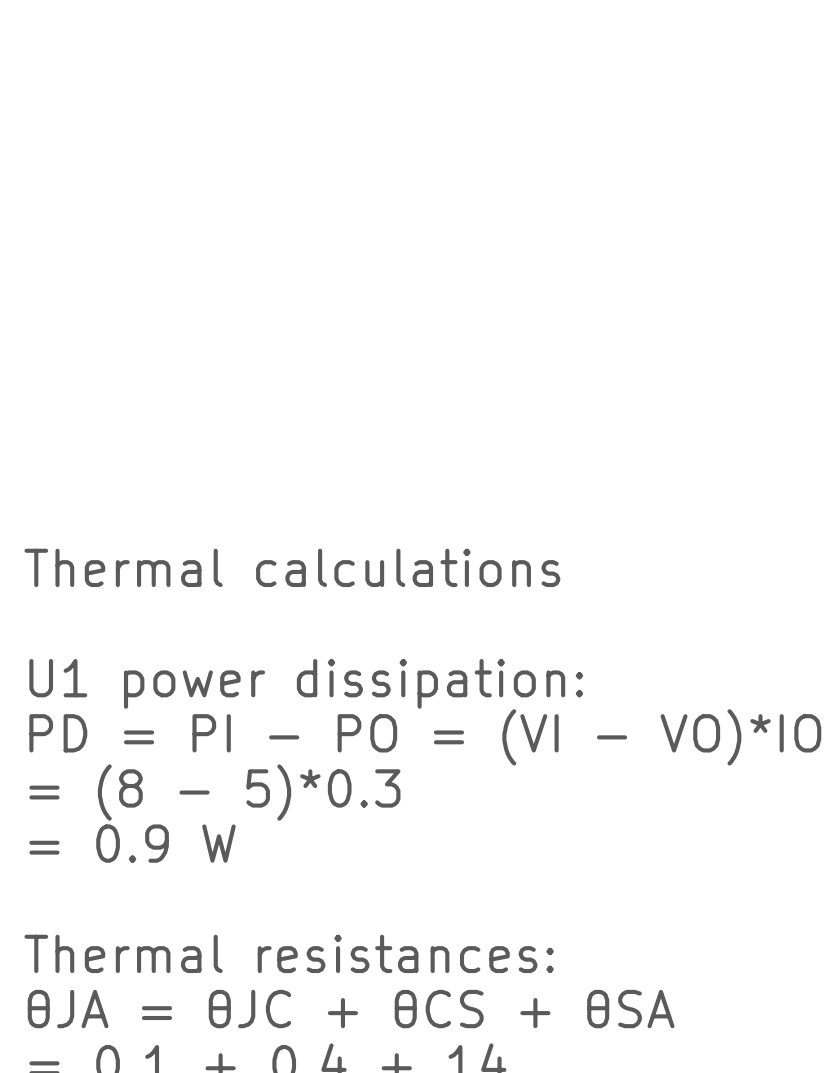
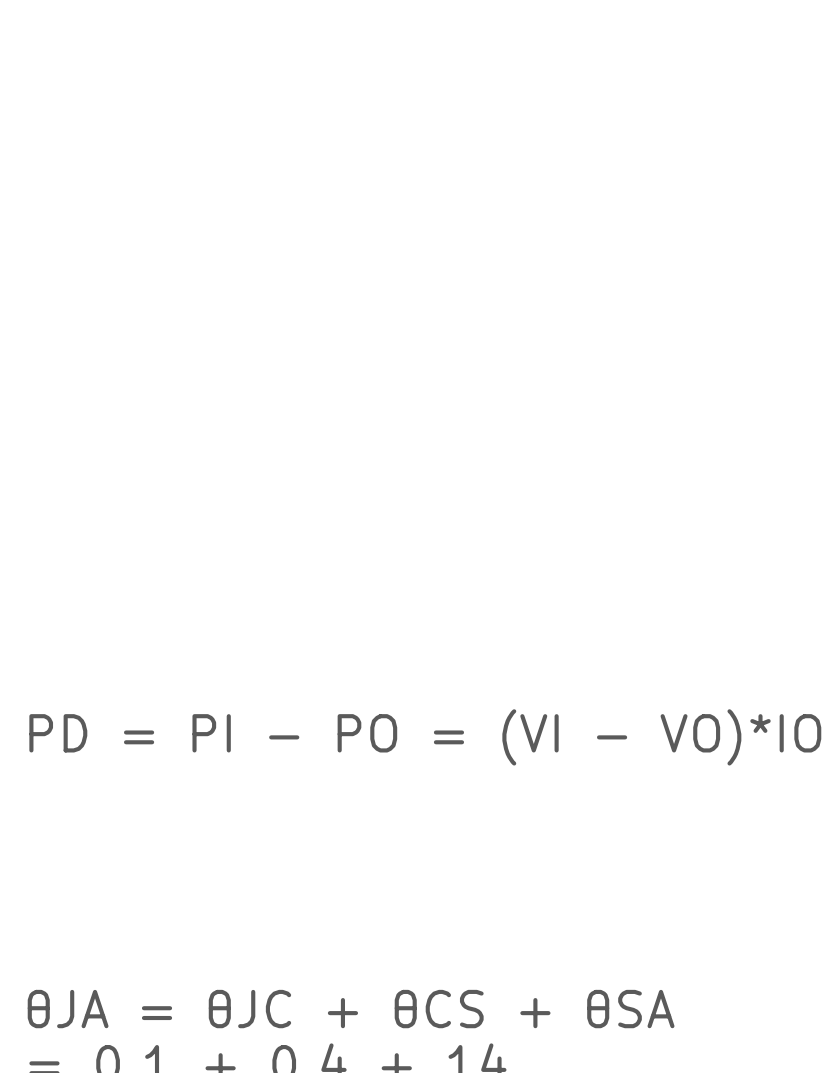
text: Thermal calculations (292, 567) -> none
text: U1 power dissipation: (306, 683) -> none
text: = (8 - 5)*0.3 (214, 792) -> none
text: = 0.9 W (132, 843) -> none
text: Thermal resistances: (289, 953) -> none

